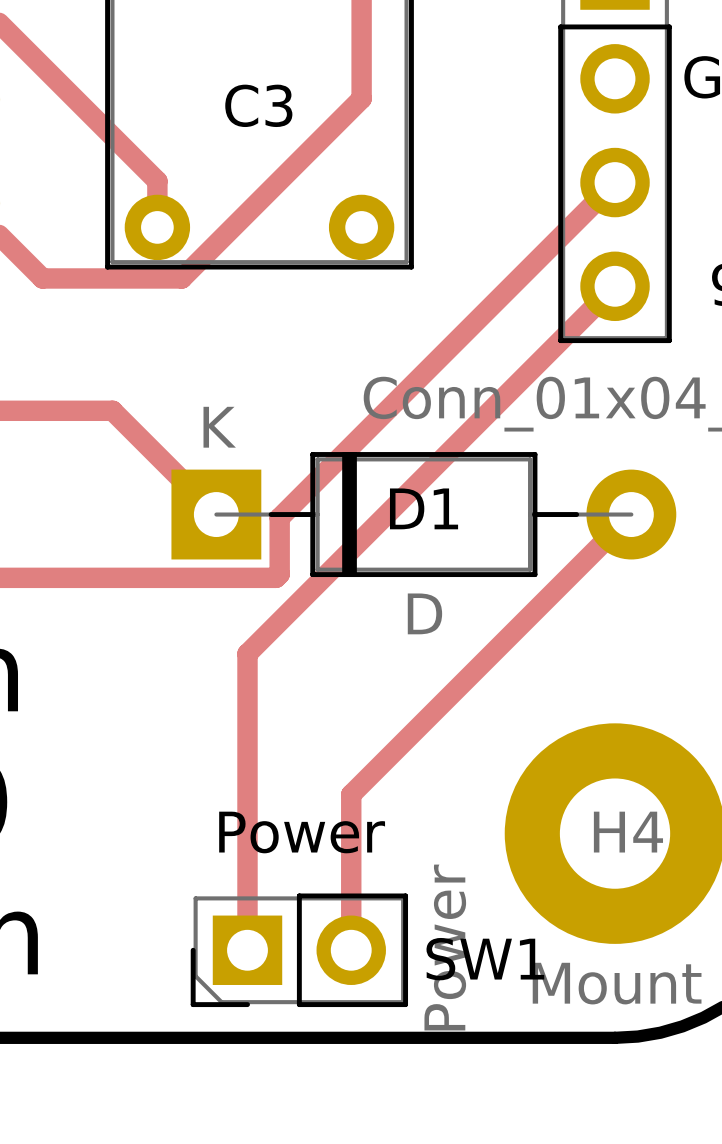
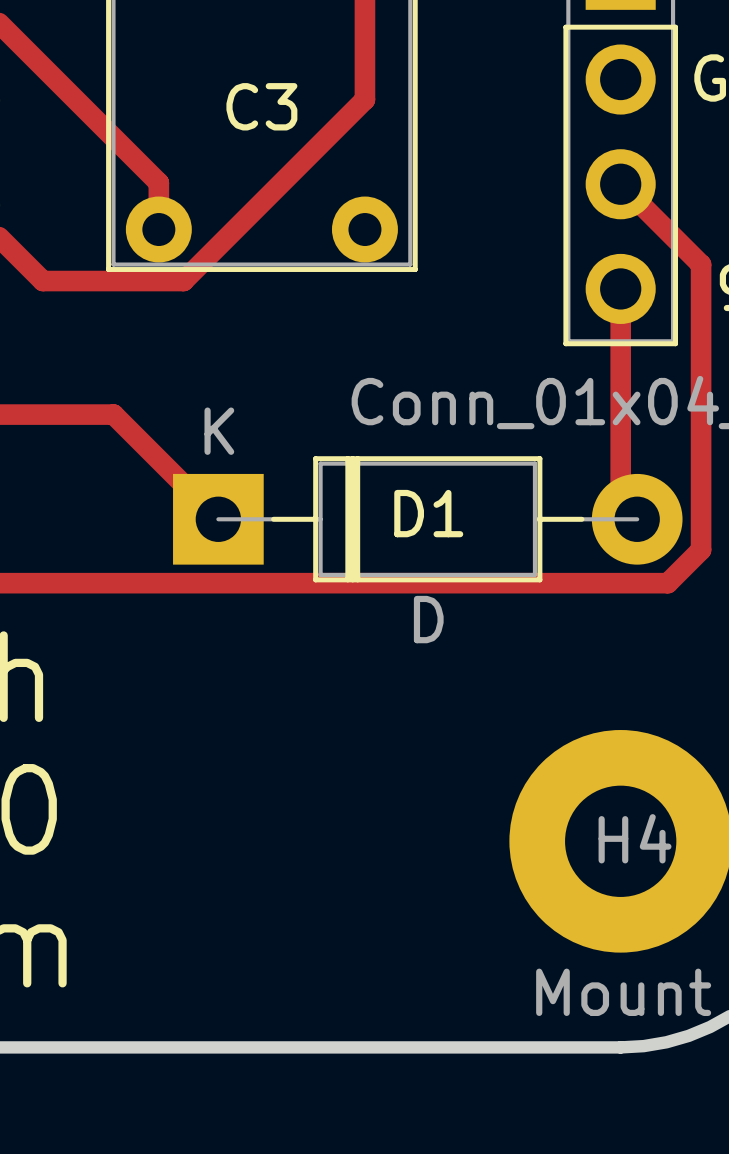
track: (615, 182) (279, 517) (279, 574) (276, 577) -> (620, 184) (701, 264) (701, 549) (667, 583) (278, 583)
track: (615, 286) (247, 653) (247, 950) -> (620, 288) (620, 502) (637, 519)
track: (631, 514) (351, 794) (351, 950) -> none
text: Power (302, 832) -> none
SW1: Power (299, 950) -> none

